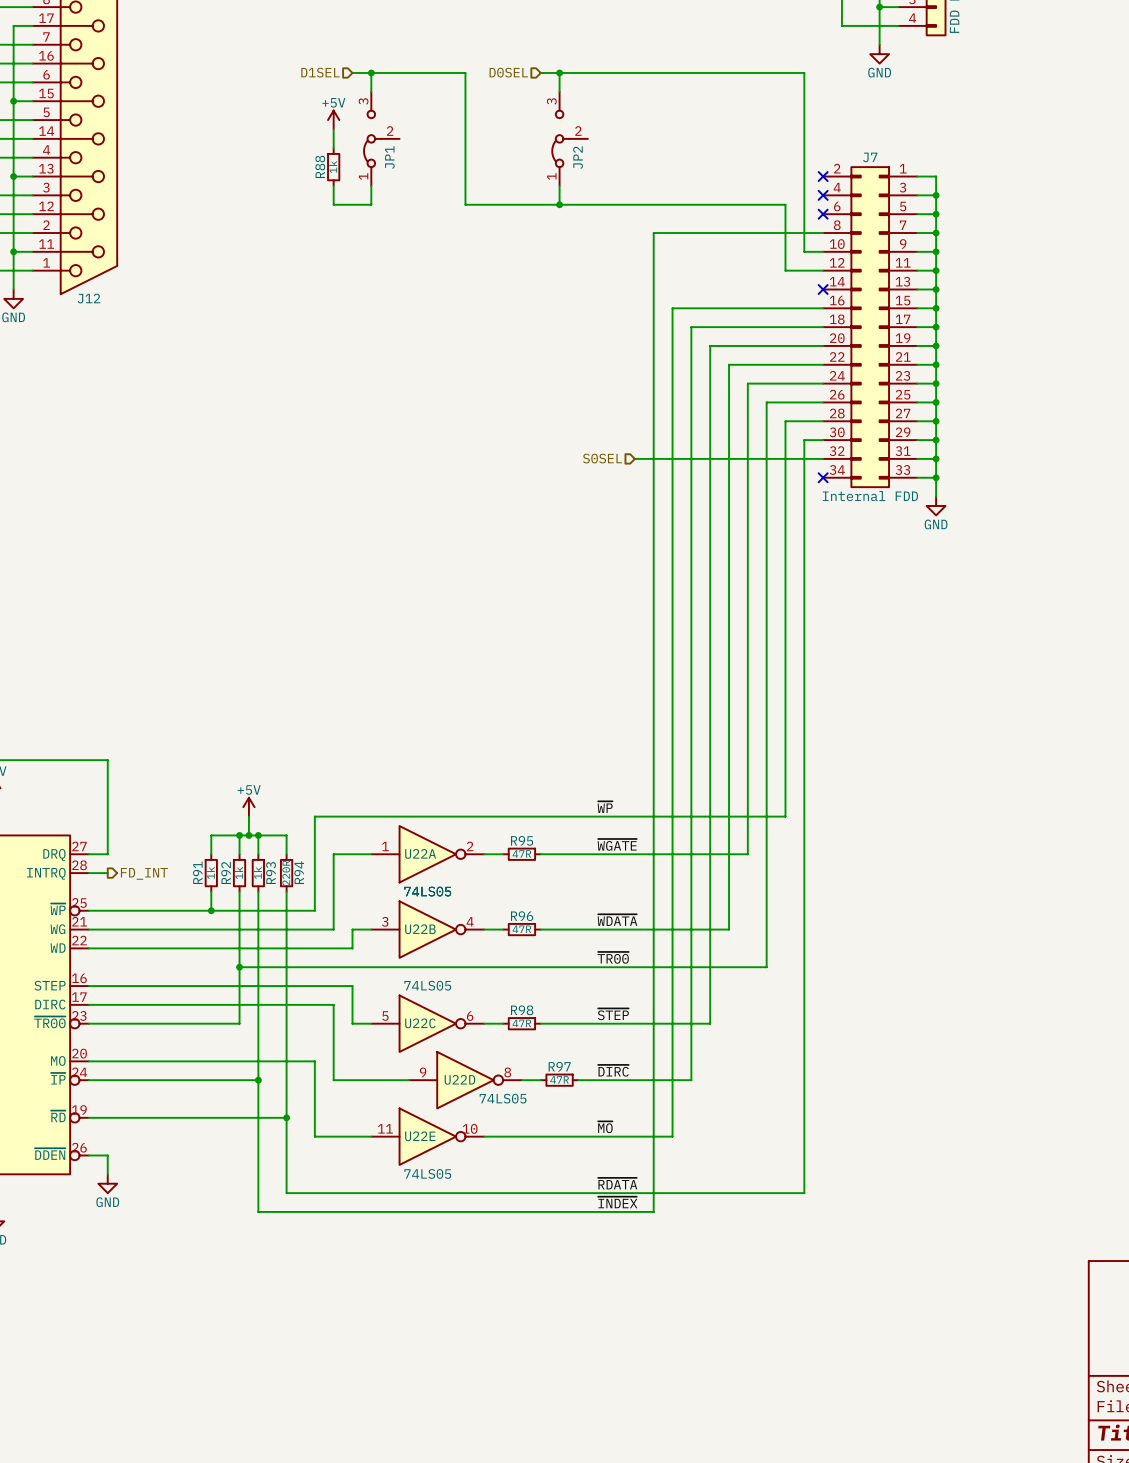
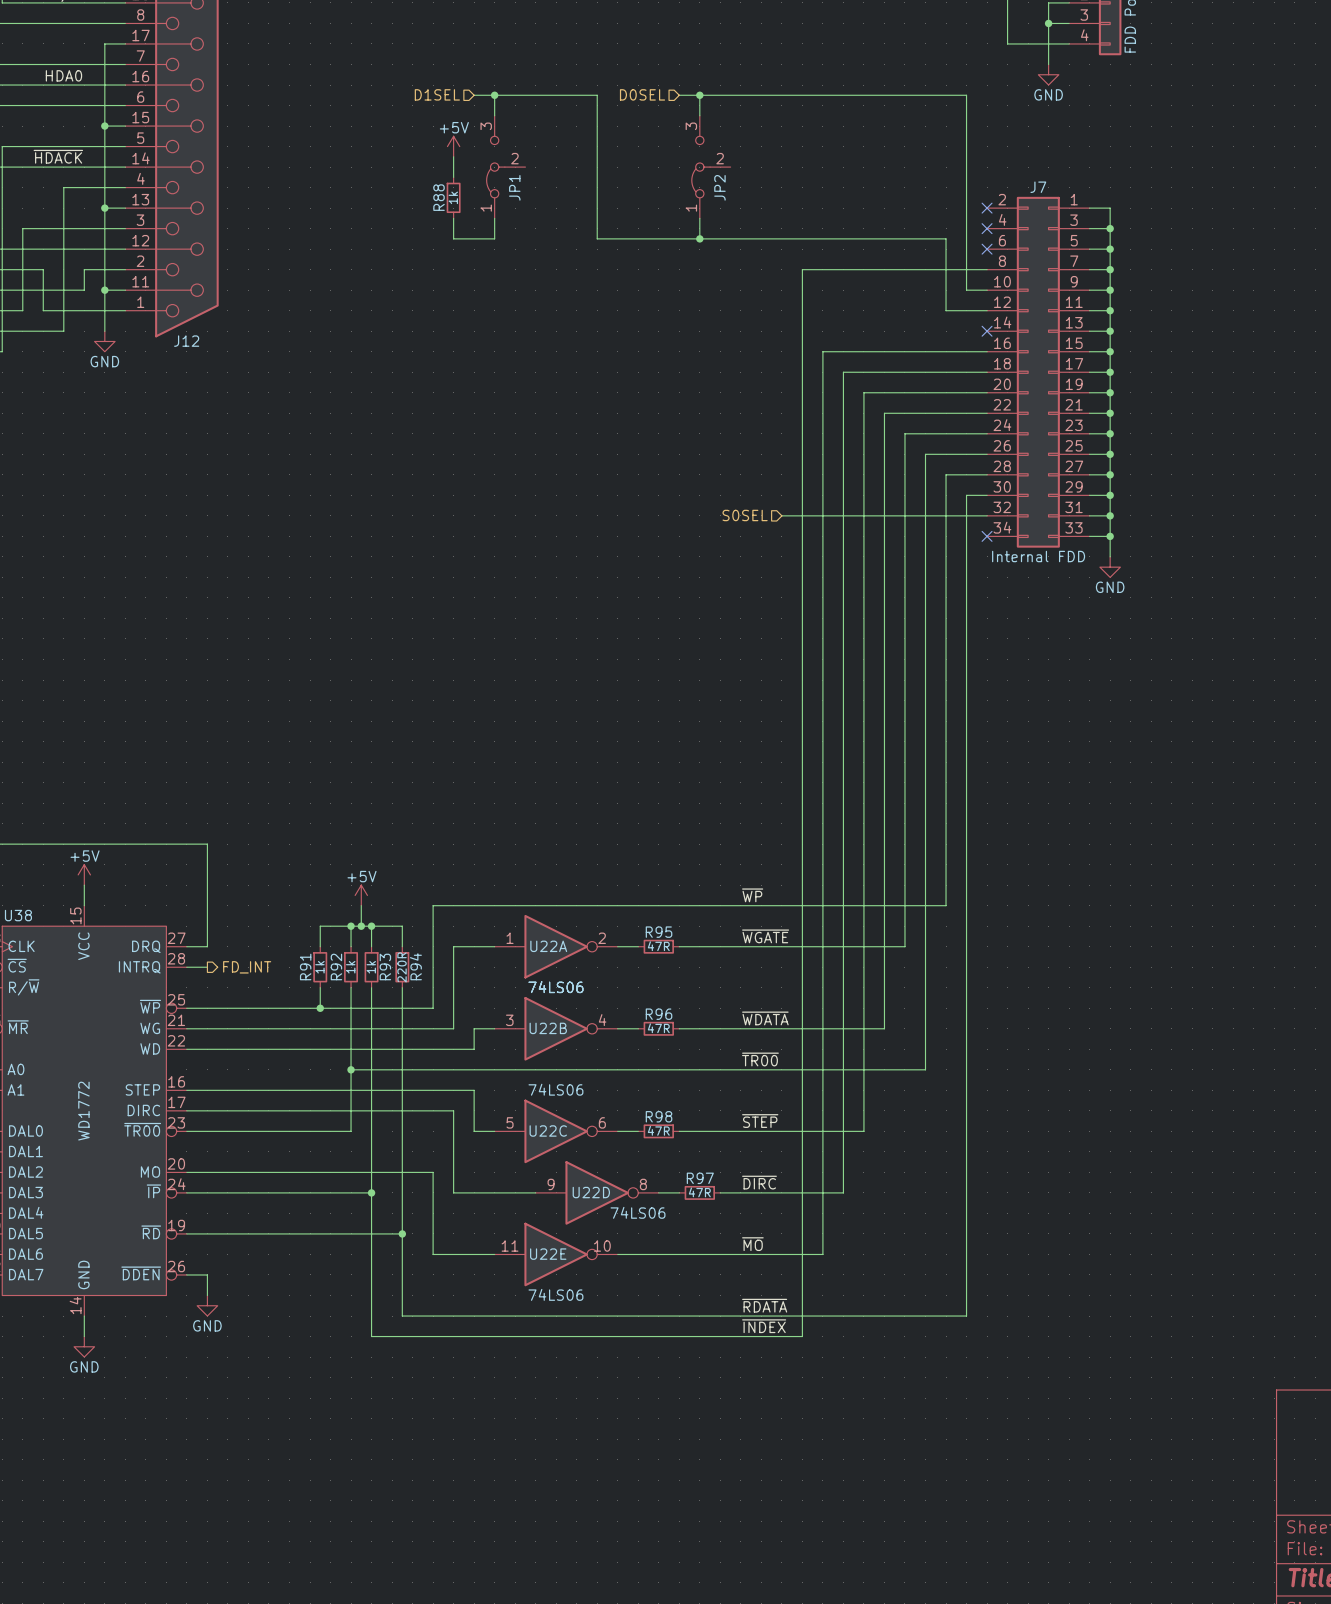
U22B value: 74LS05 (427, 891) -> 74LS06 (555, 987)
U22A value: 74LS05 (427, 891) -> 74LS06 (555, 987)
U22C value: 74LS05 (427, 985) -> 74LS06 (555, 1089)
U22D value: 74LS05 (503, 1098) -> 74LS06 (638, 1212)
U22E value: 74LS05 (427, 1173) -> 74LS06 (555, 1294)

